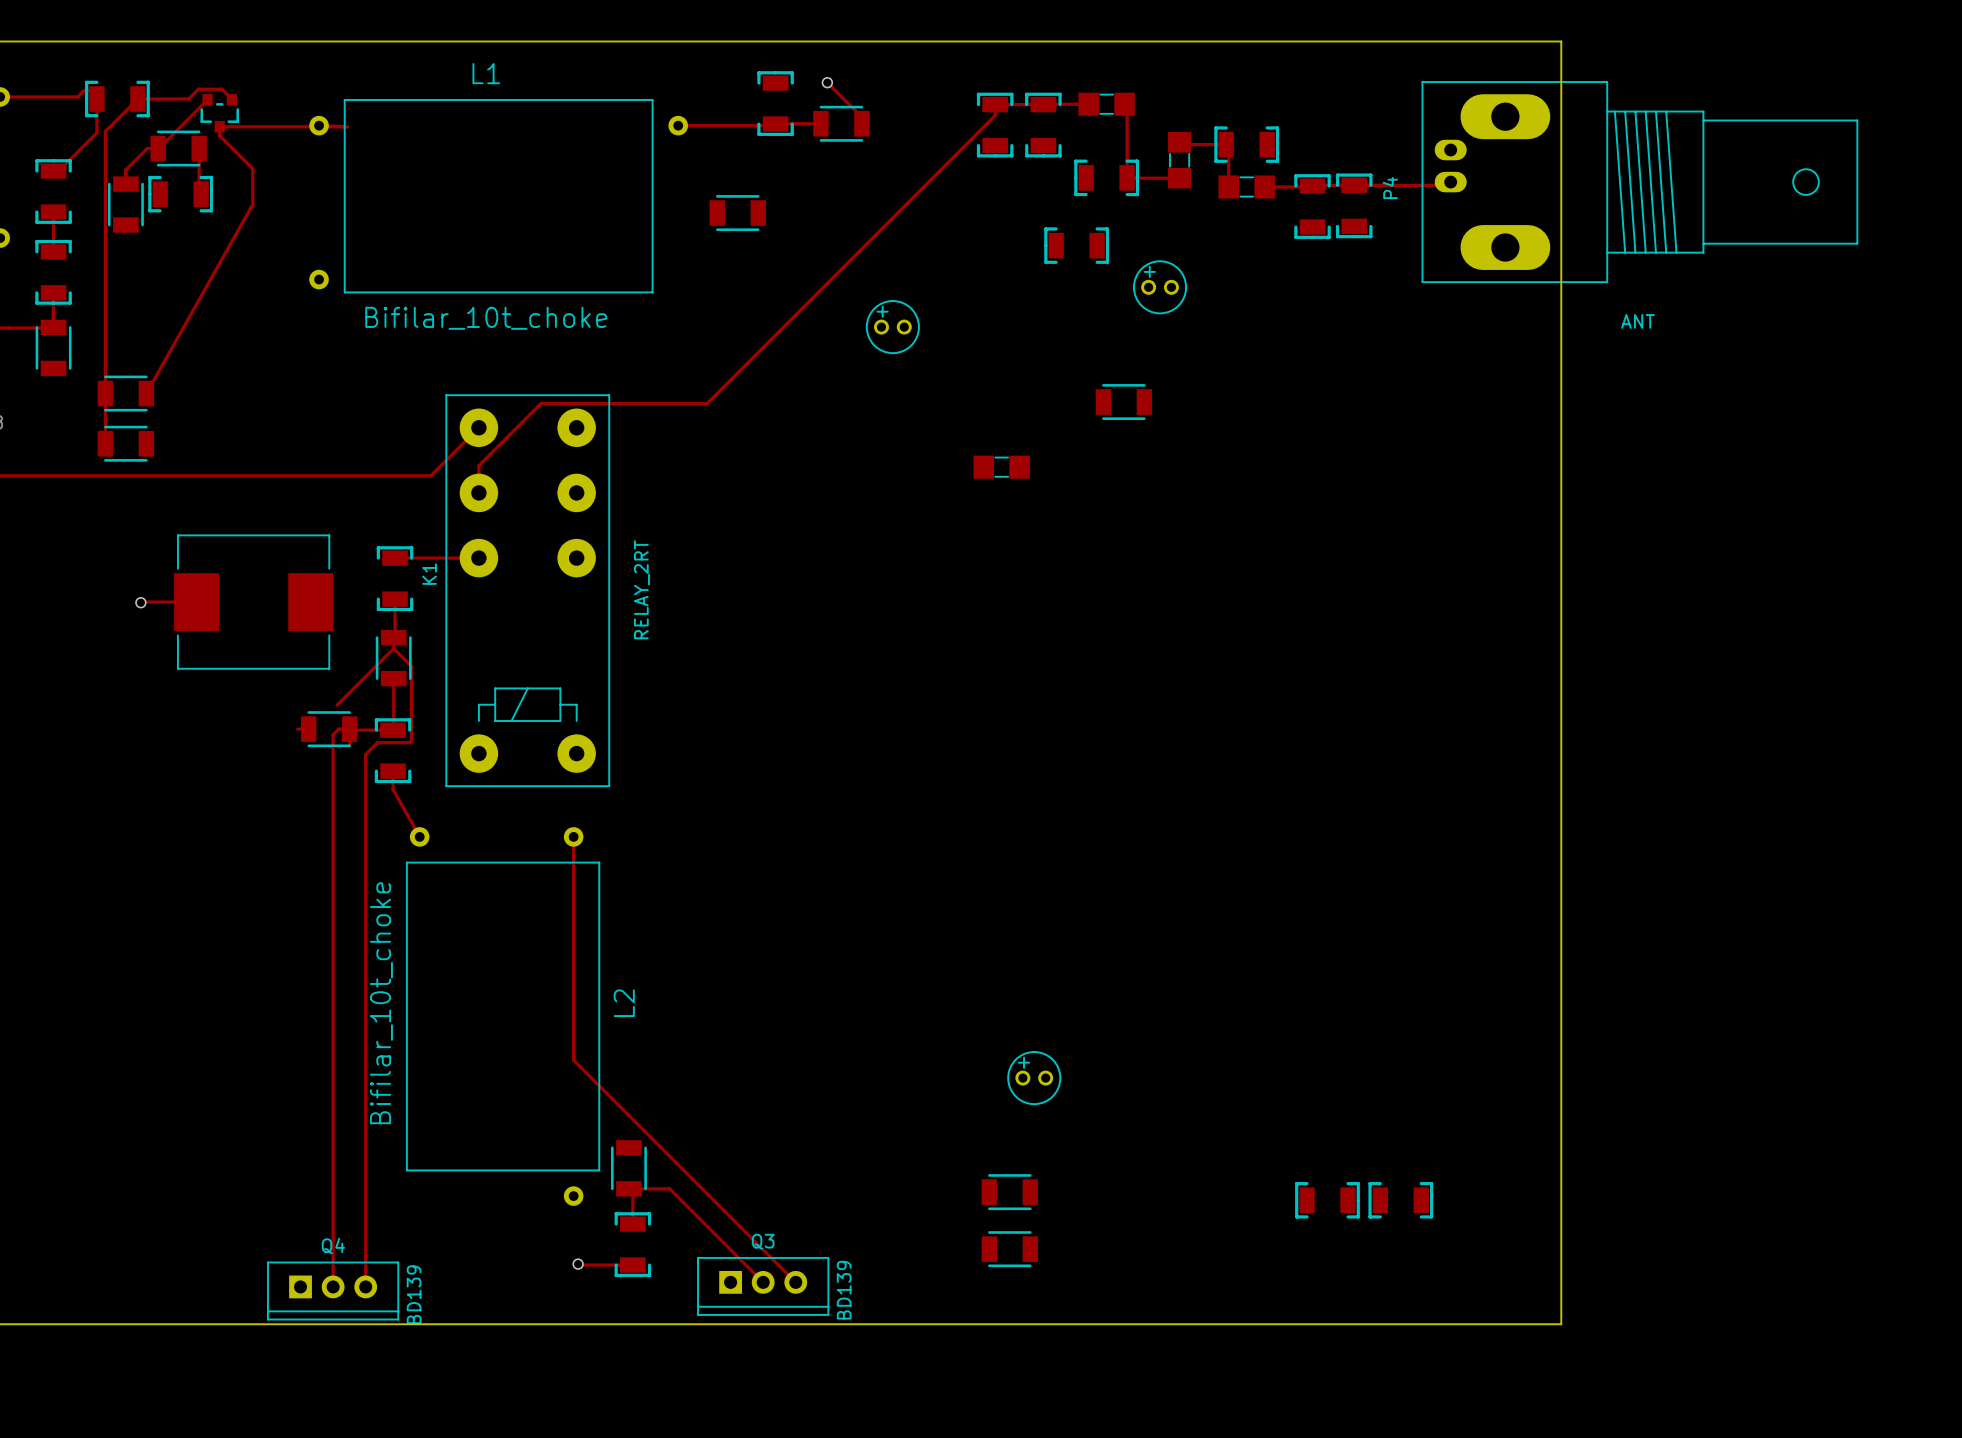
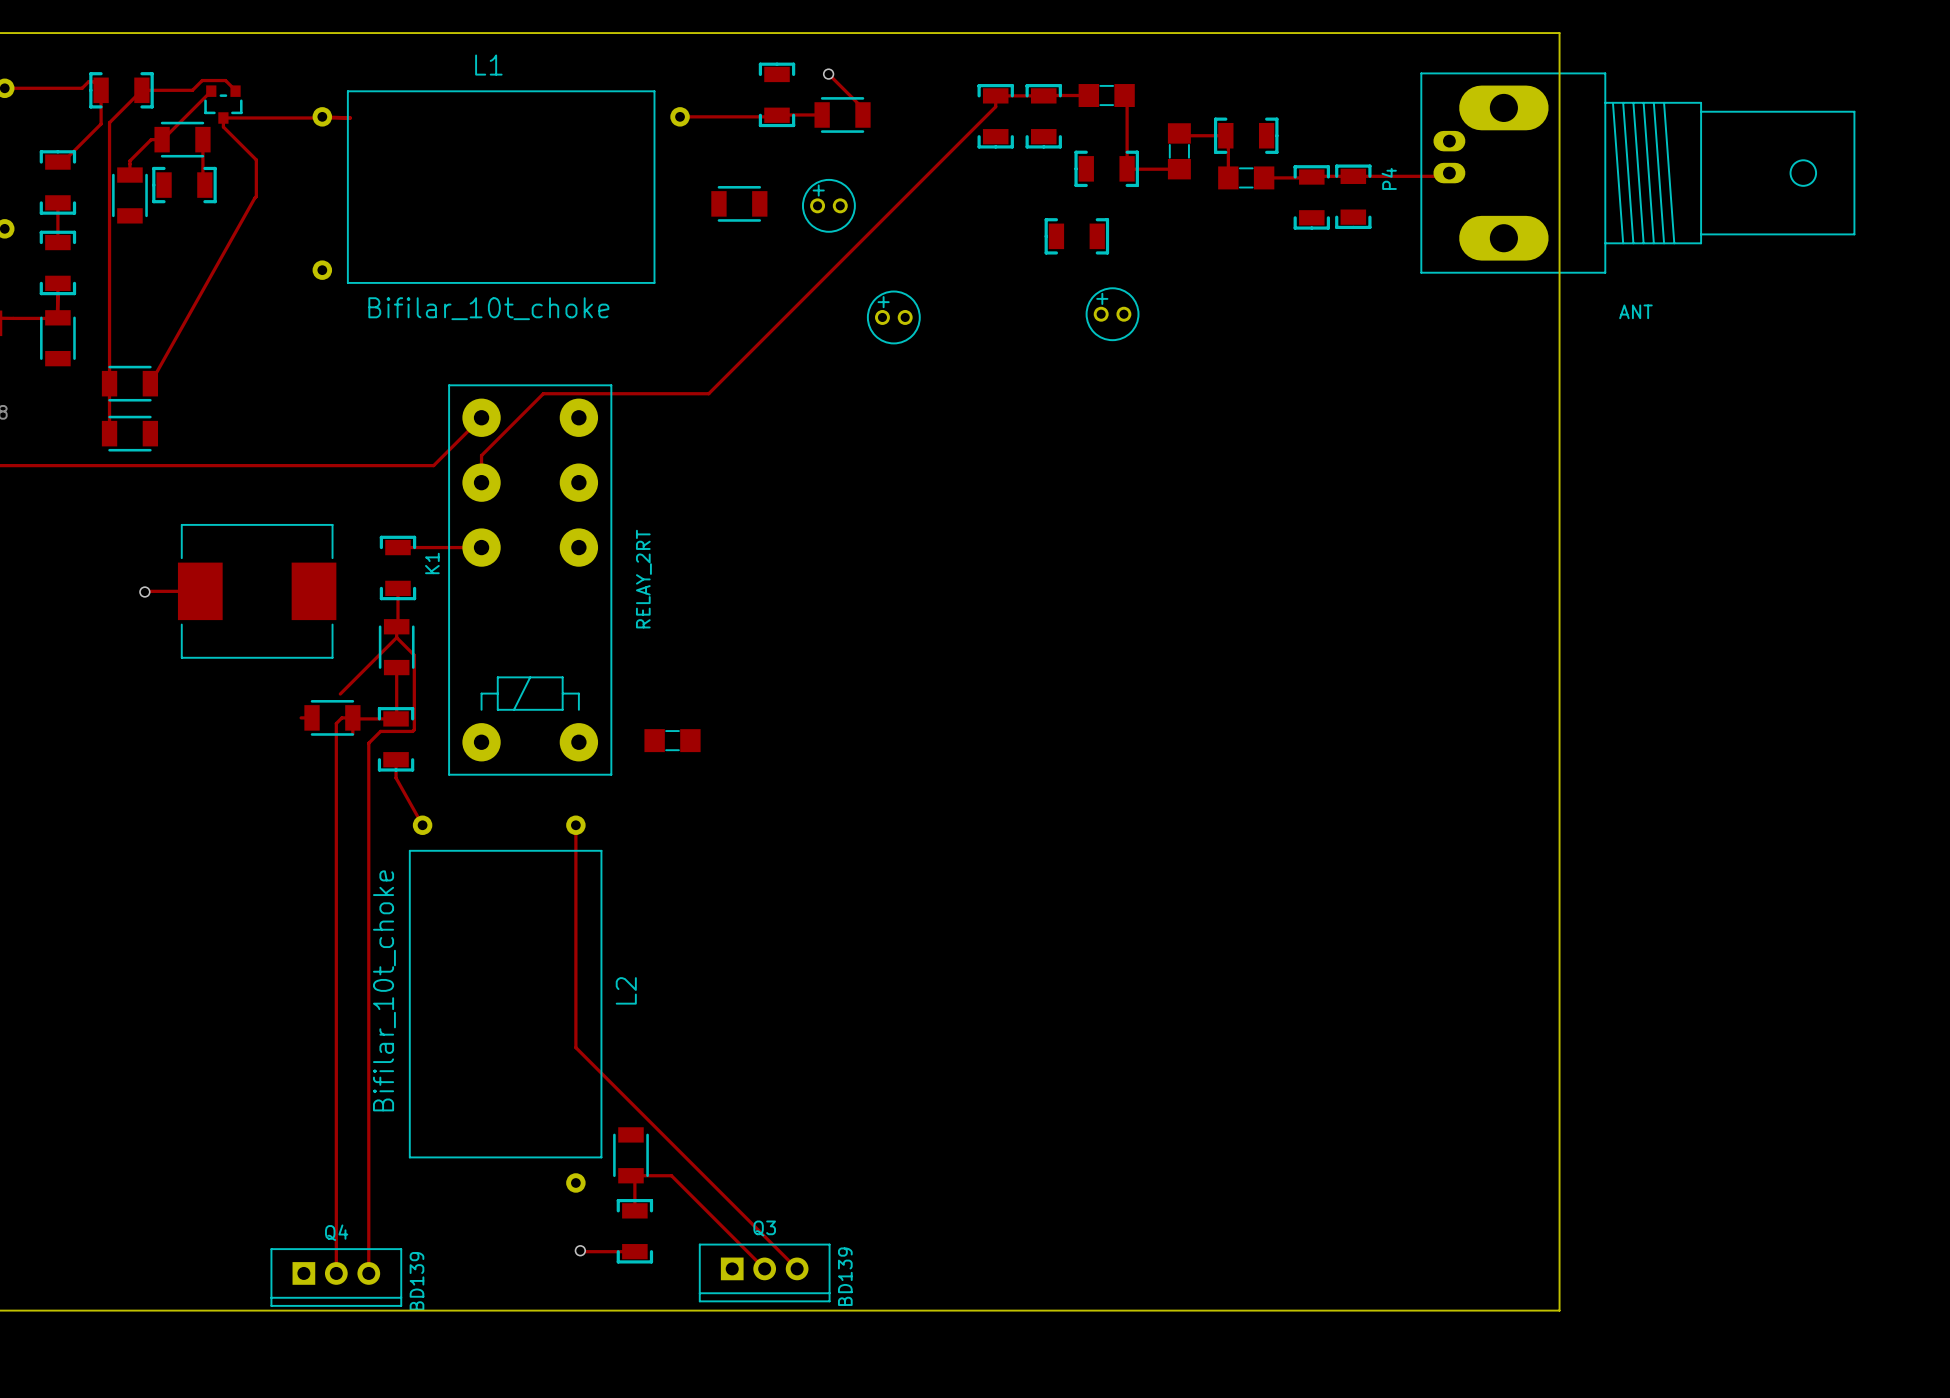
part: none -> (828, 205)
part position: (1160, 287) -> (1112, 314)
part: (1123, 402) -> none
part: (1001, 467) -> none
part: none -> (672, 740)
part: (1034, 1078) -> none
part: (1009, 1192) -> none
part: (1327, 1200) -> none
part: (1400, 1200) -> none
part: (1009, 1249) -> none

